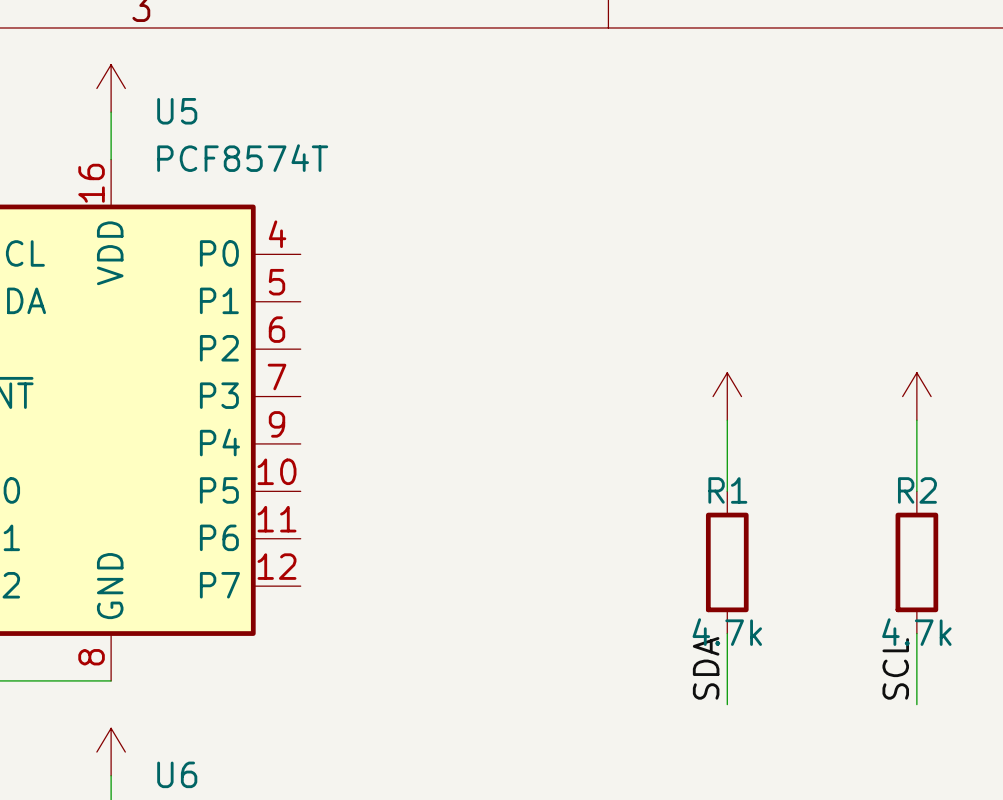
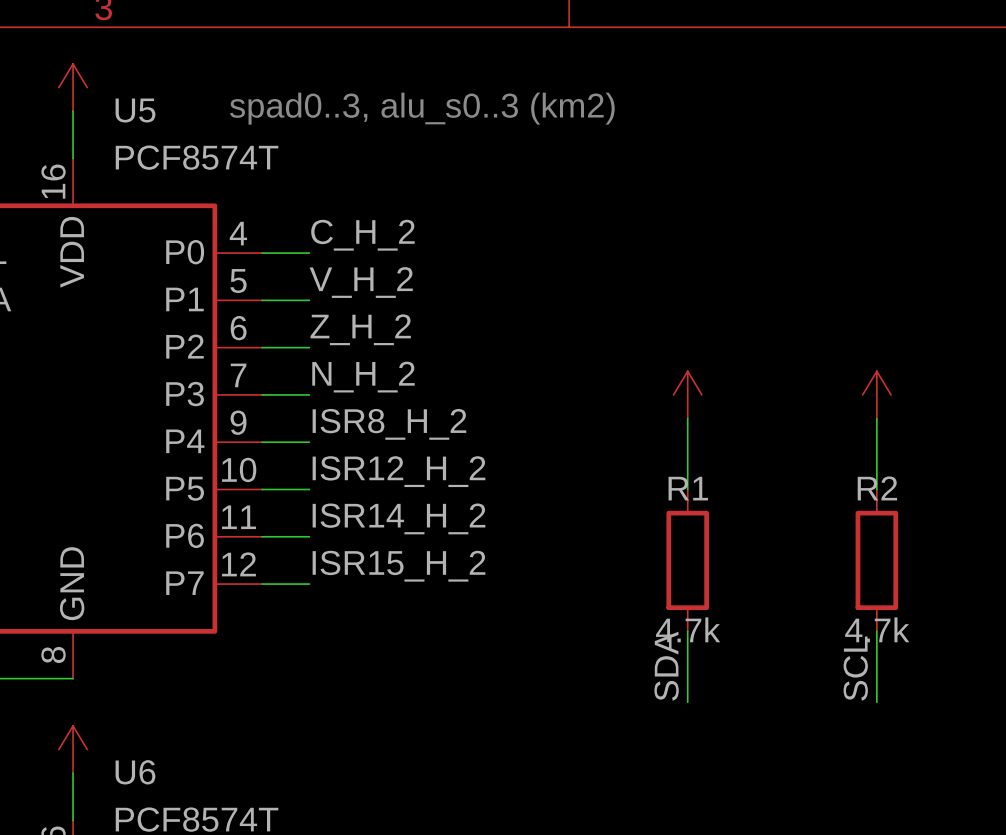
text: none -> spad0..3, alu_s0..3 (km2) (422, 108)
label: none -> C_H_2 (362, 235)
wire: none -> (262, 253) (309, 253)
label: none -> V_H_2 (361, 282)
wire: none -> (262, 300) (309, 300)
label: none -> Z_H_2 (360, 329)
wire: none -> (262, 347) (309, 347)
label: none -> N_H_2 (363, 377)
wire: none -> (262, 394) (309, 394)
label: none -> ISR8_H_2 (389, 424)
wire: none -> (262, 442) (309, 442)
label: none -> ISR12_H_2 (399, 471)
wire: none -> (262, 489) (309, 489)
label: none -> ISR14_H_2 (399, 518)
wire: none -> (262, 536) (309, 536)
label: none -> ISR15_H_2 (399, 566)
wire: none -> (262, 584) (309, 584)

